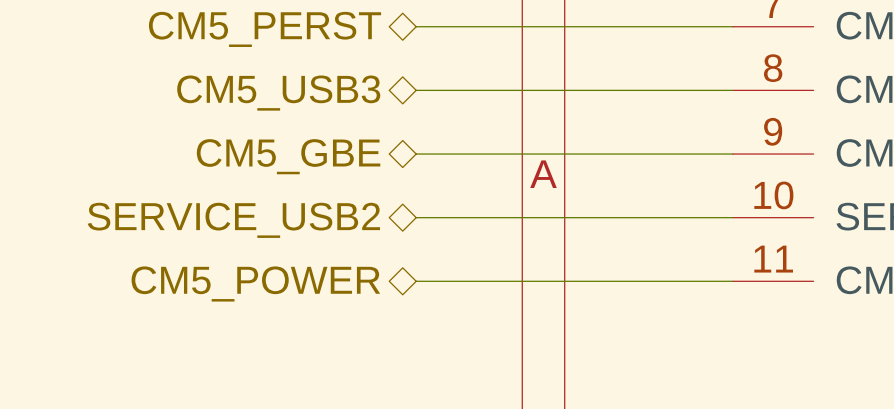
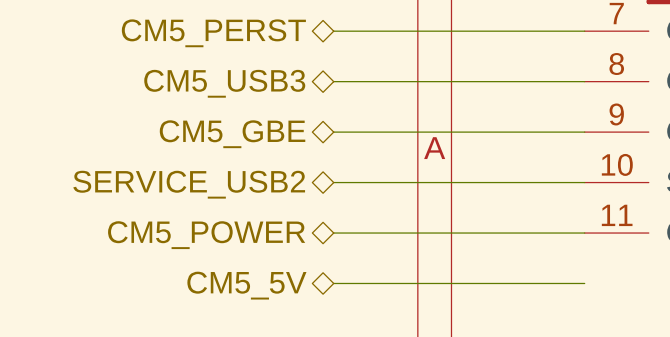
wire: none -> (333, 283) (584, 283)
hierarchical label: none -> CM5_5V (246, 285)

